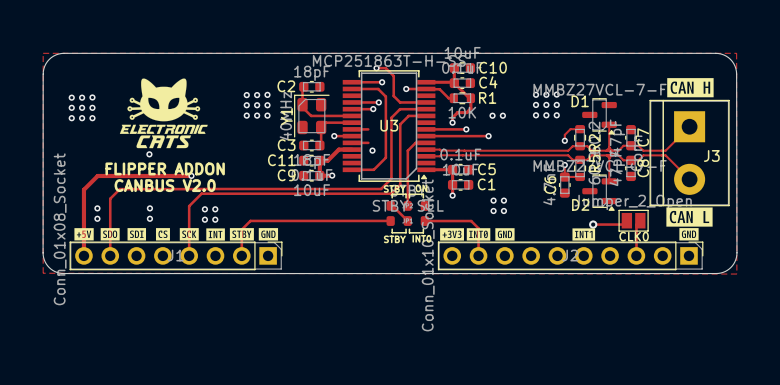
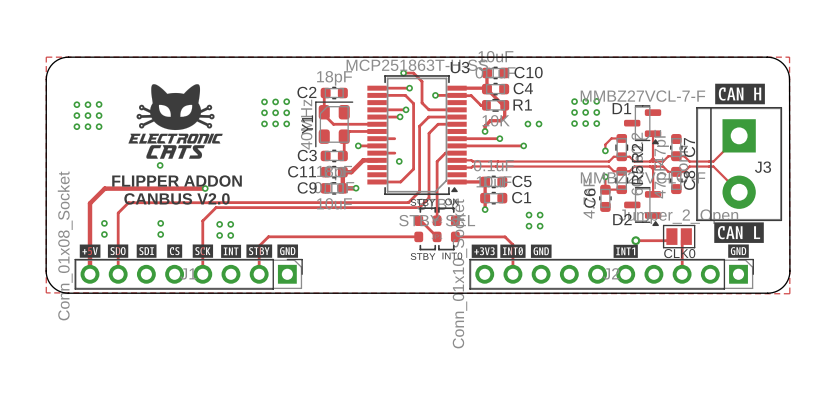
U3 name position: U3 (389, 125) -> U3 (460, 67)

